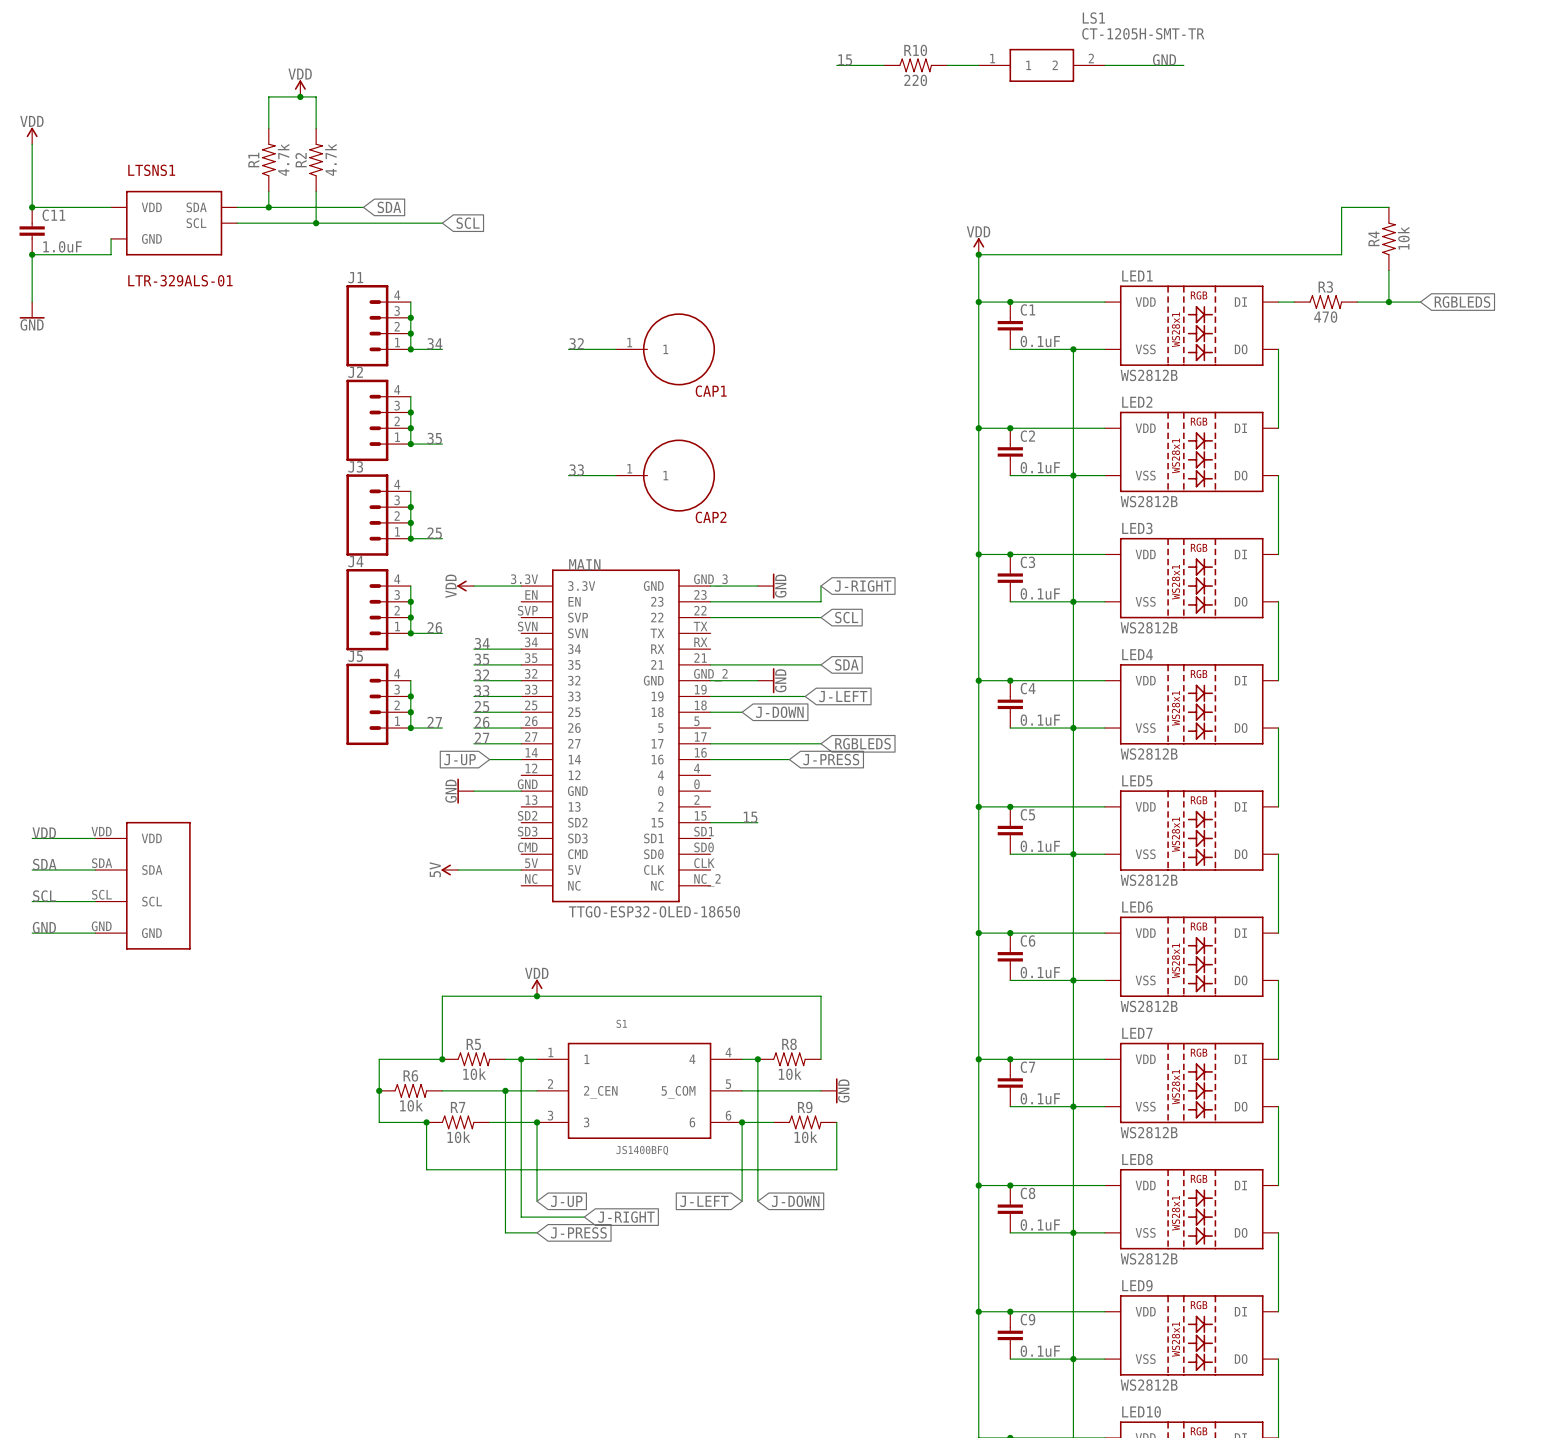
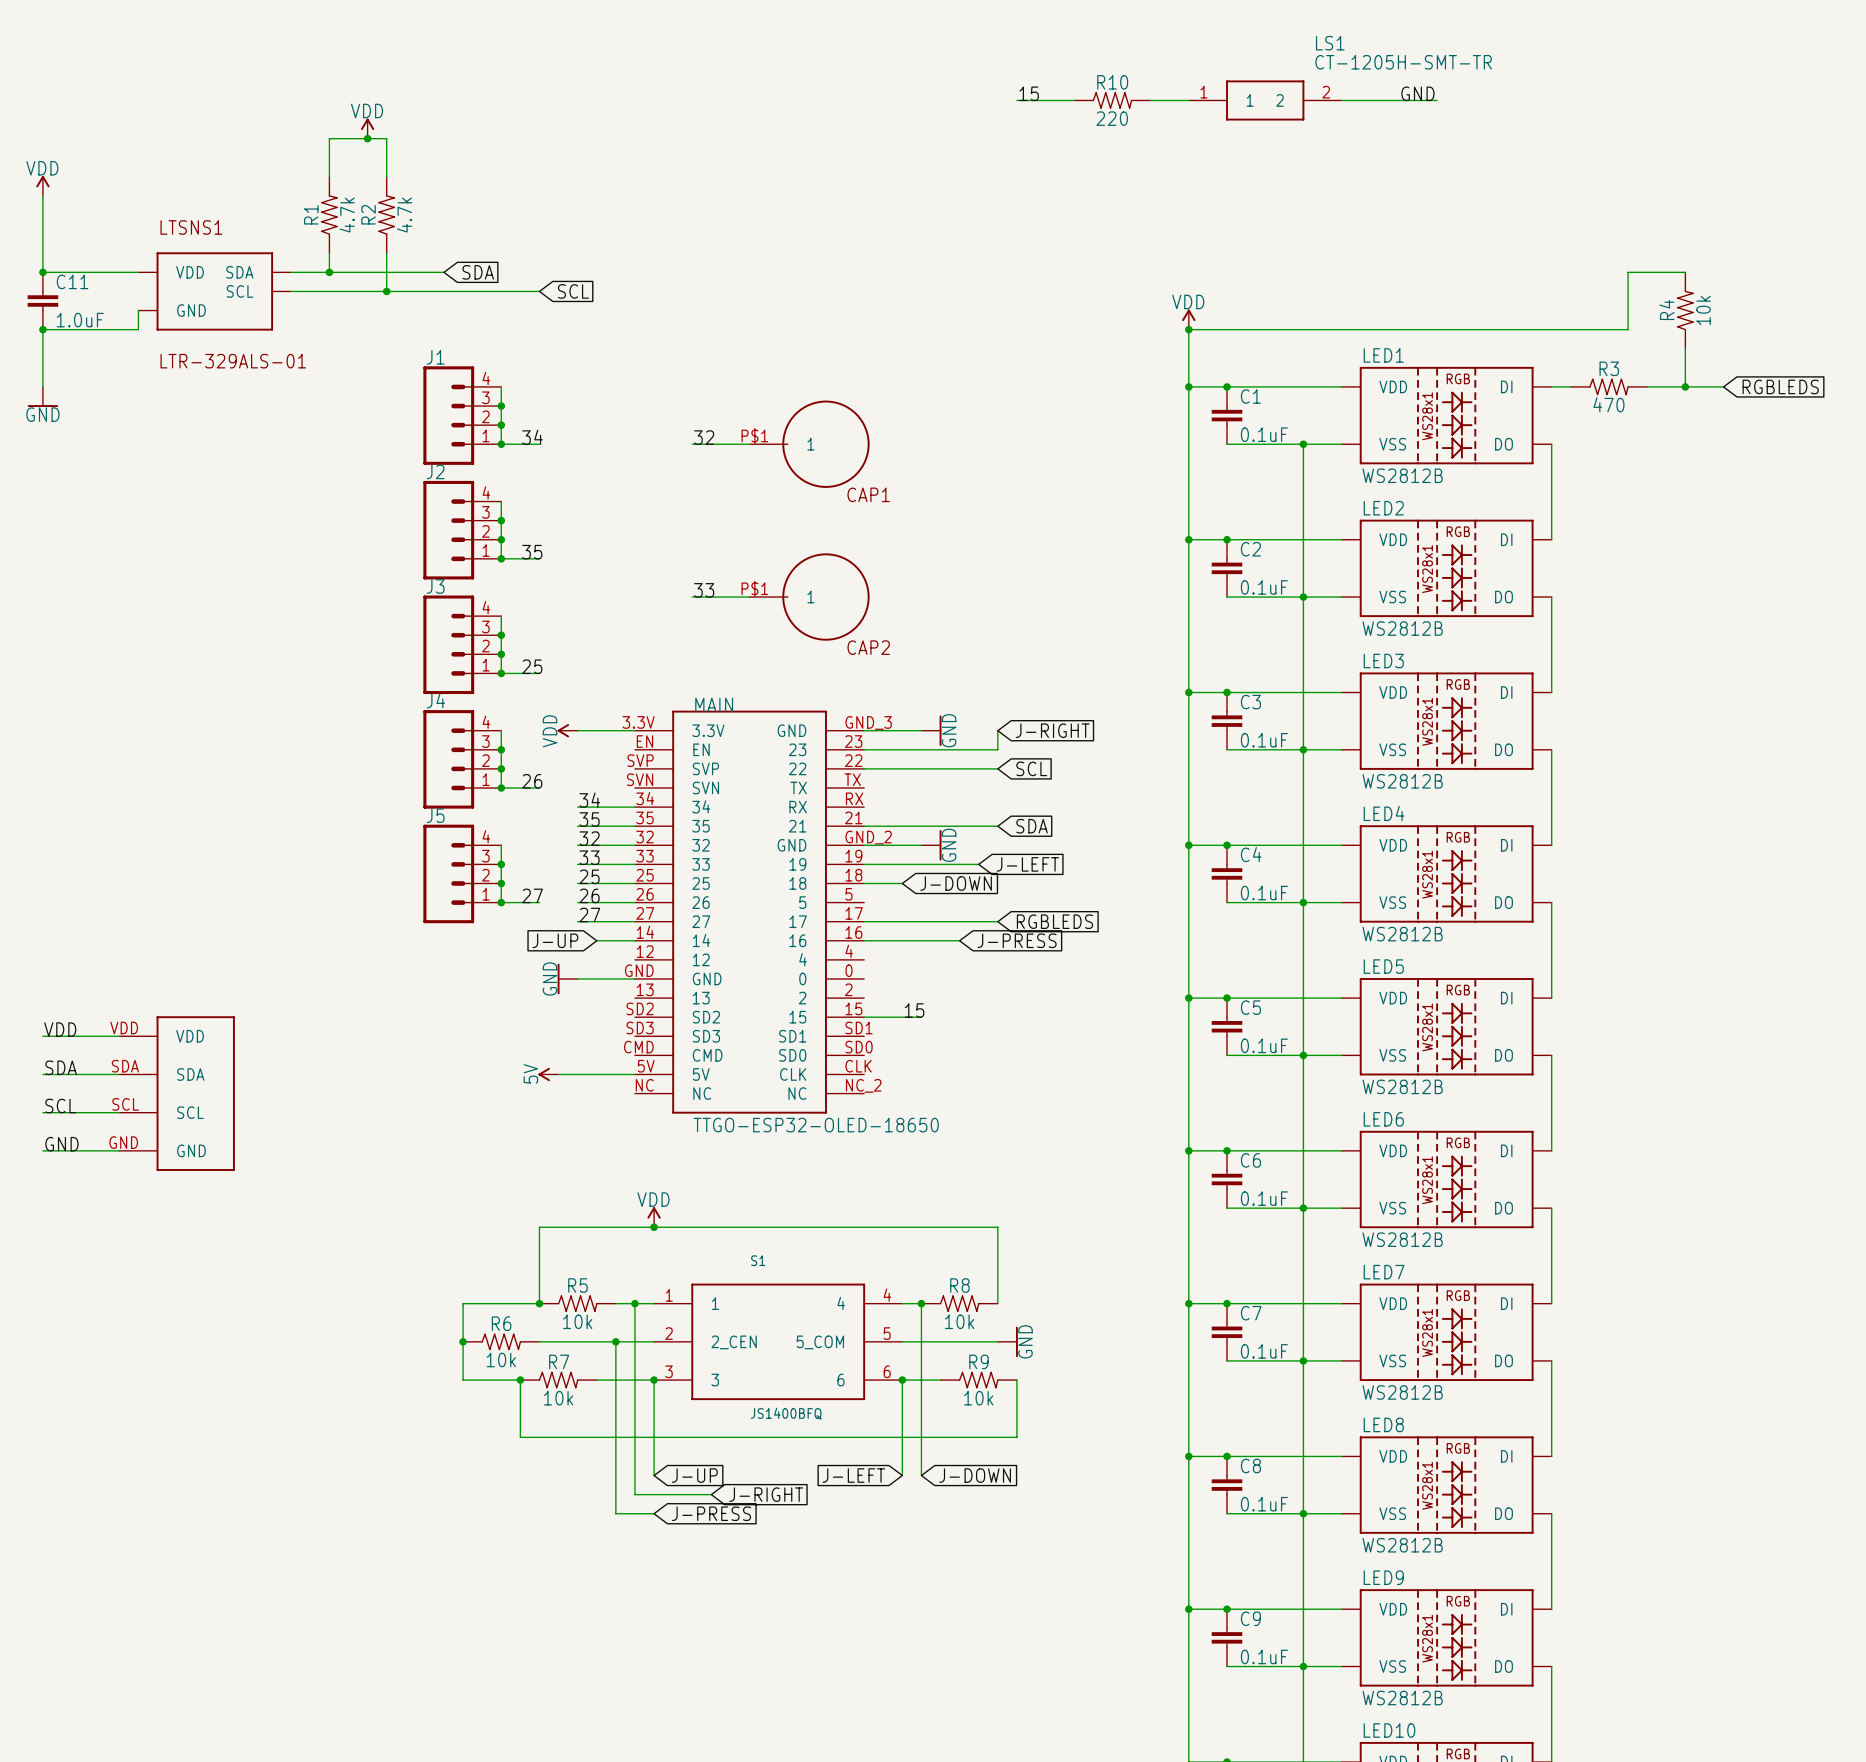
CAP1 pin number: 1 (629, 342) -> P$1 (754, 435)
CAP2 pin number: 1 (629, 468) -> P$1 (754, 588)

